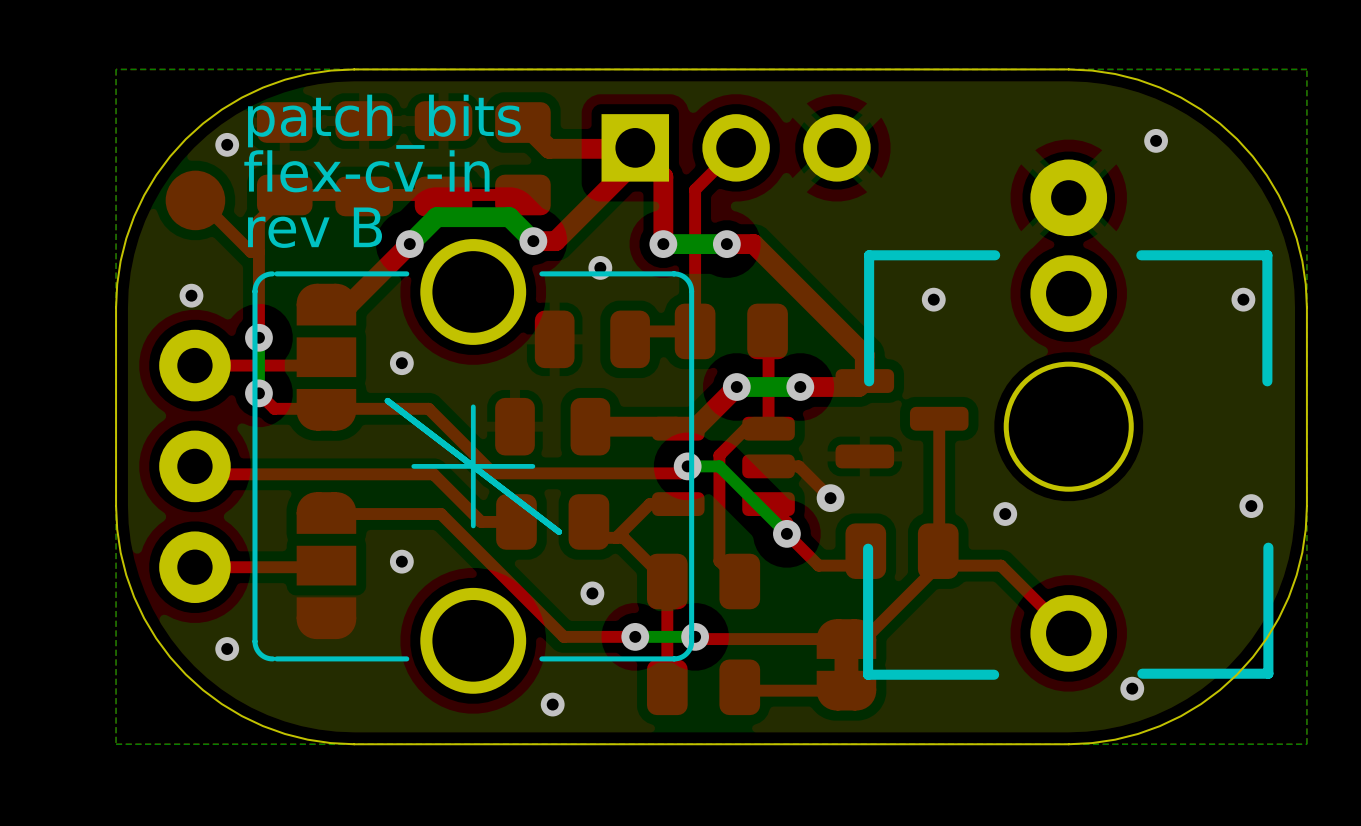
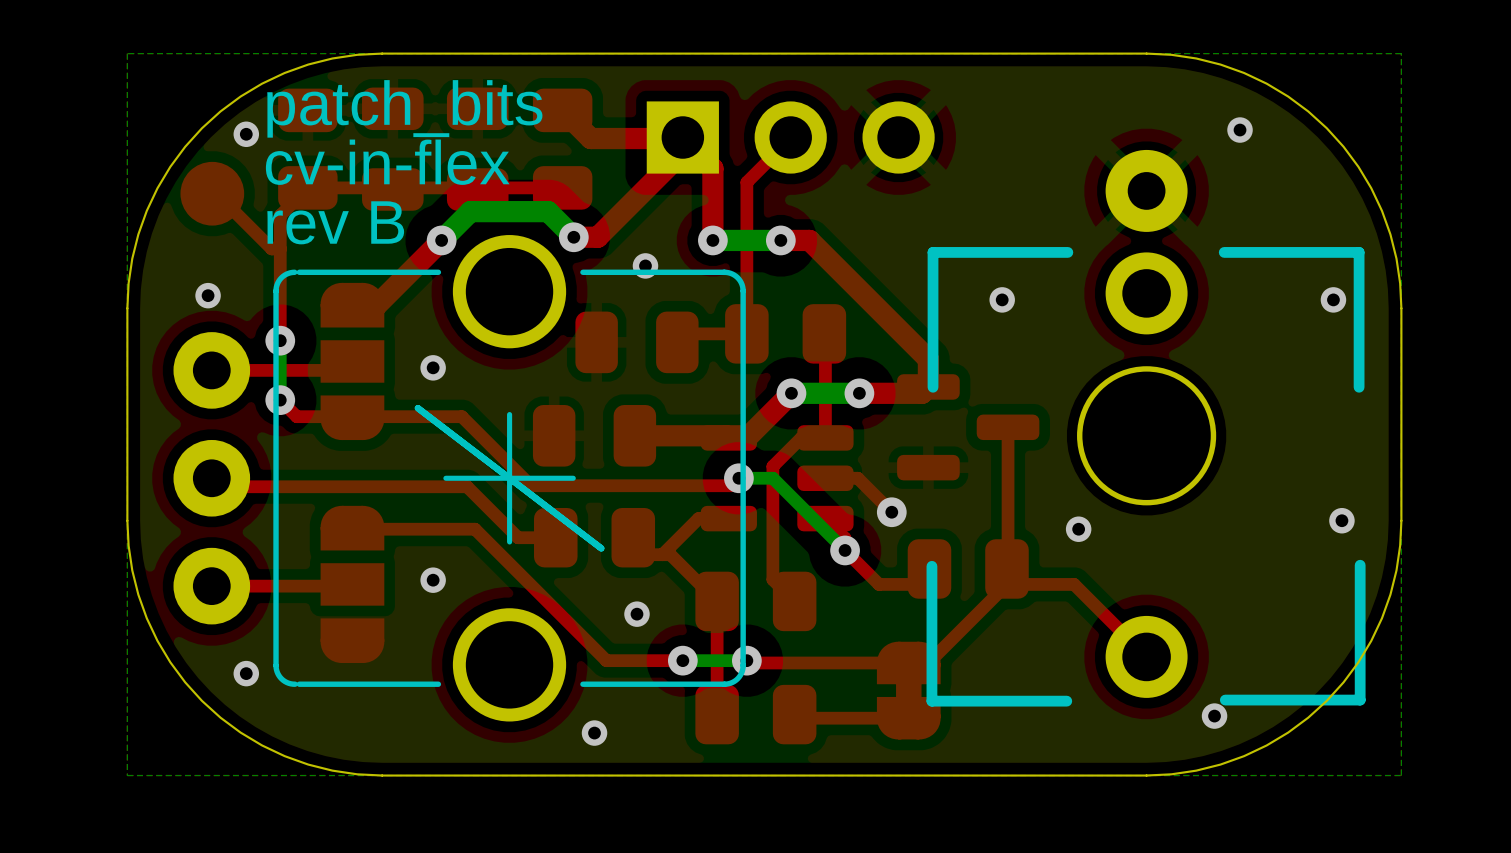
text: flex-cv-in (366, 171) -> cv-in-flex (387, 162)

